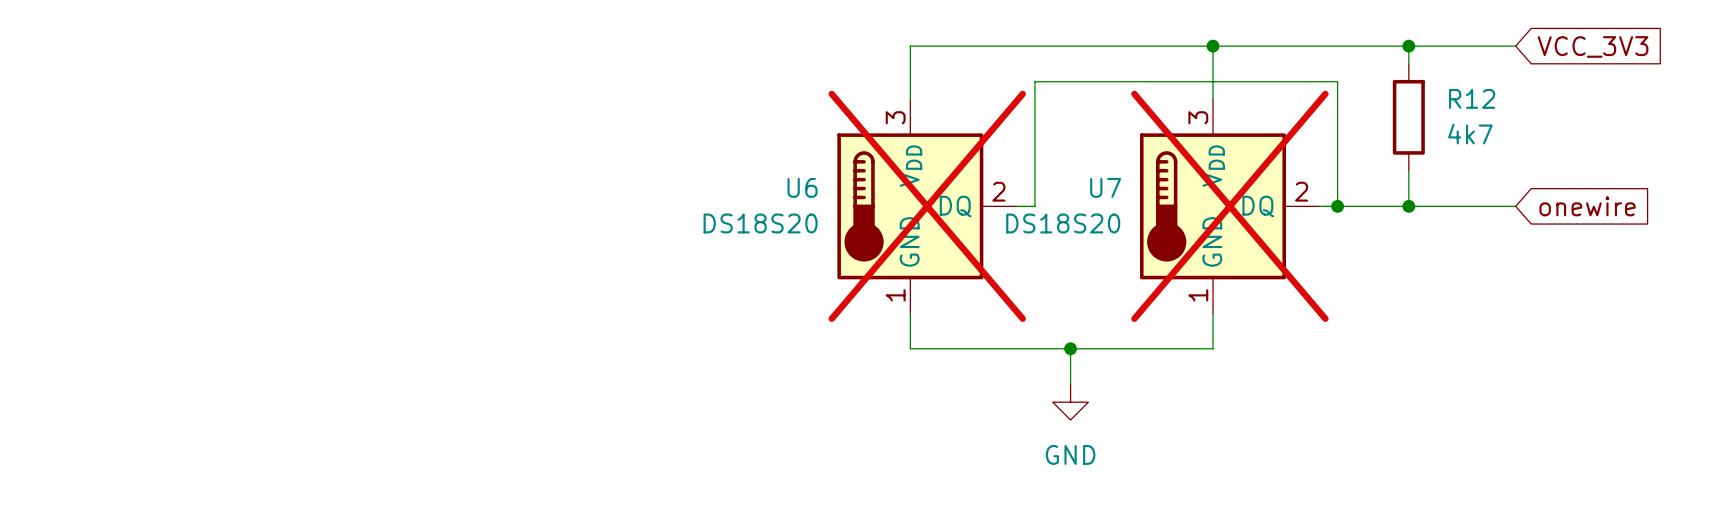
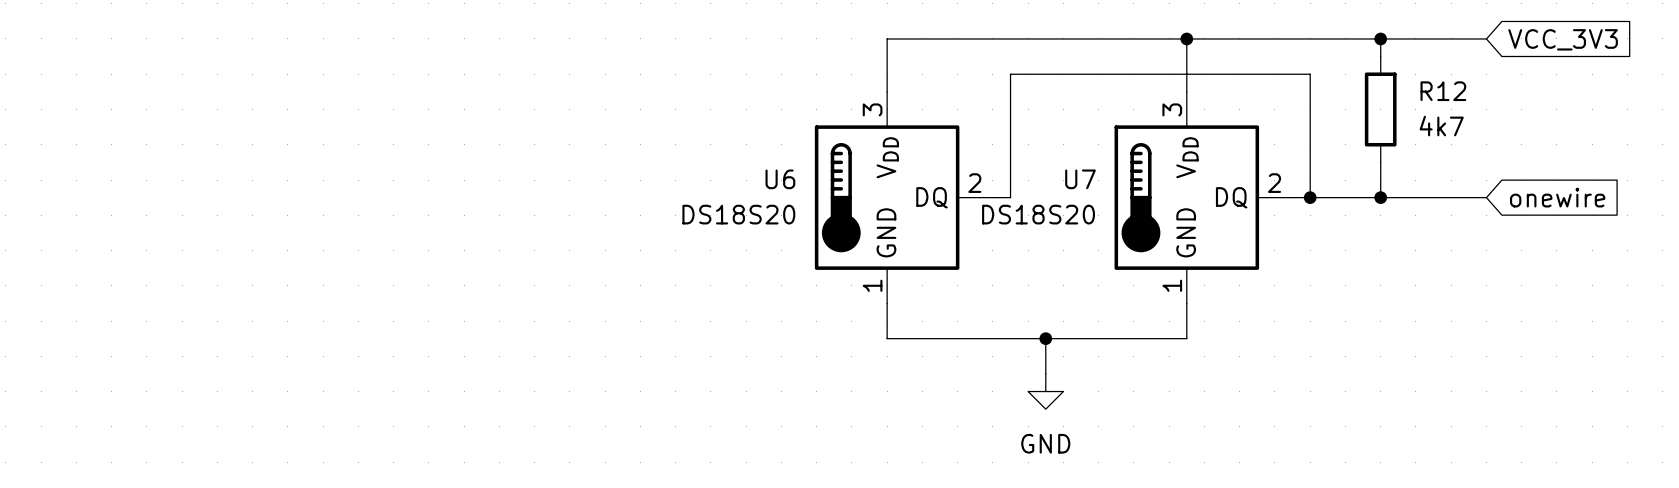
U6 do-not-place cross: (927, 206) -> none
U7 do-not-place cross: (1229, 206) -> none

